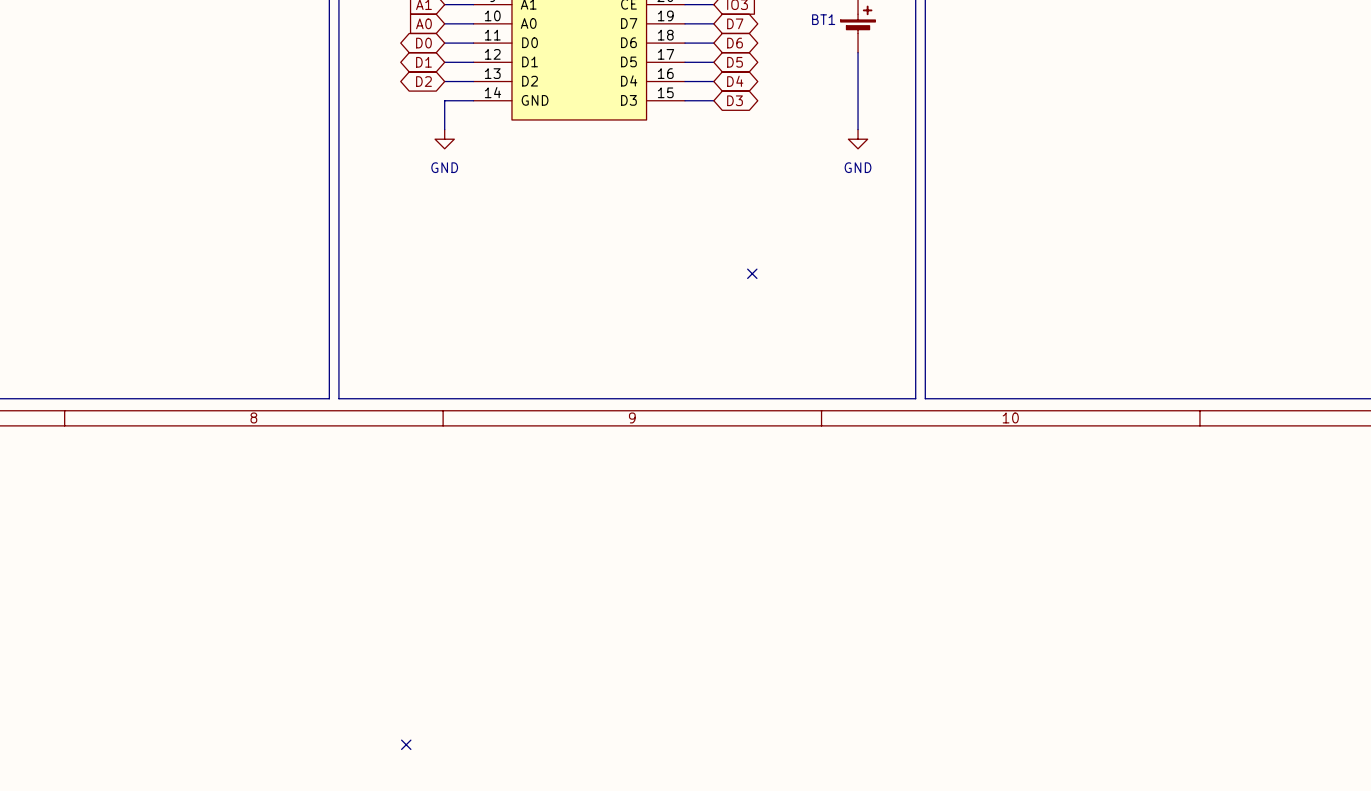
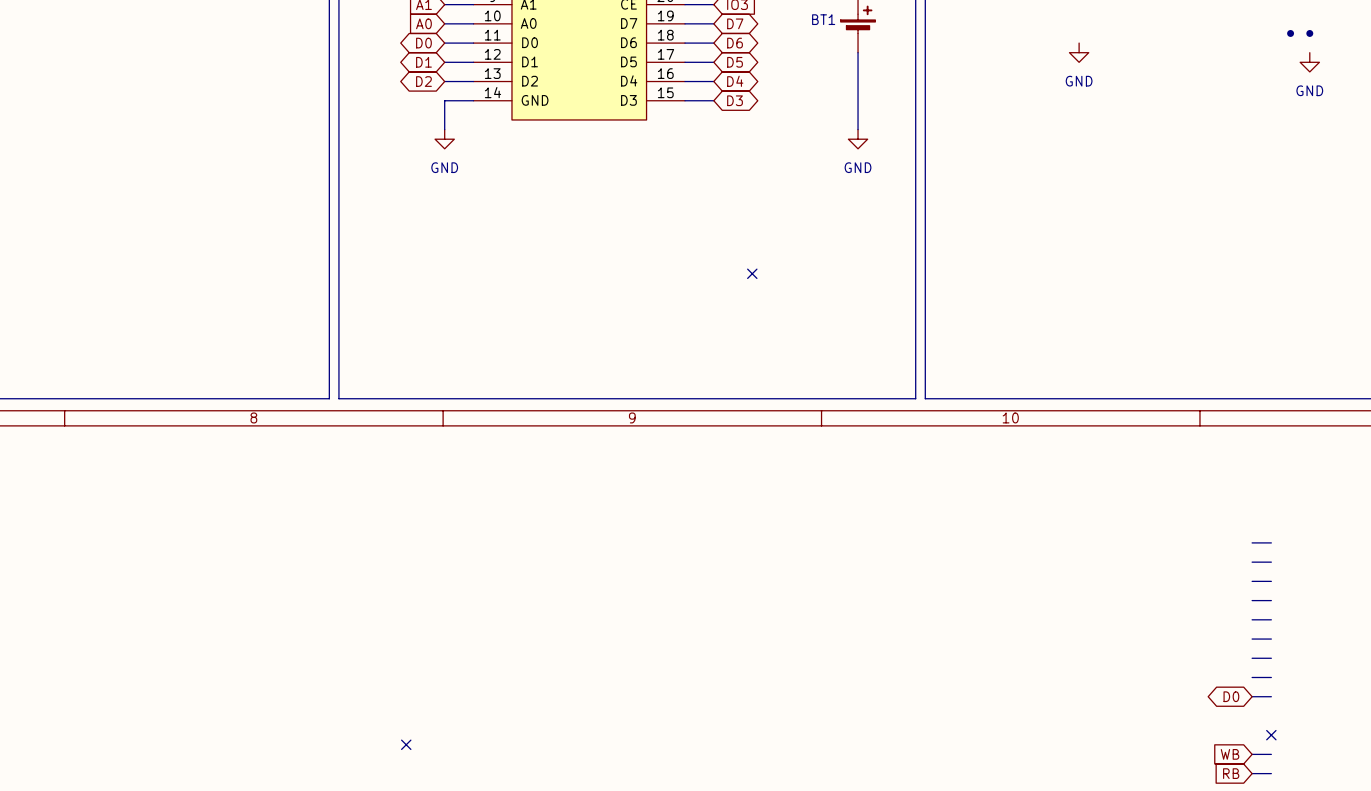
junction: none -> (1290, 33)
junction: none -> (1309, 33)
power symbol: none -> GND (1079, 52)
power symbol: none -> GND (1309, 62)
wire: none -> (1252, 542) (1271, 542)
wire: none -> (1252, 562) (1271, 562)
wire: none -> (1252, 581) (1271, 581)
wire: none -> (1252, 600) (1271, 600)
wire: none -> (1252, 619) (1271, 619)
wire: none -> (1252, 639) (1271, 639)
wire: none -> (1252, 658) (1271, 658)
wire: none -> (1252, 677) (1271, 677)
global label: none -> D0 (1231, 696)
wire: none -> (1252, 696) (1271, 696)
no-connect mark: none -> (1271, 735)
global label: none -> WB (1230, 754)
wire: none -> (1252, 754) (1271, 754)
global label: none -> RB (1231, 773)
wire: none -> (1252, 773) (1271, 773)

